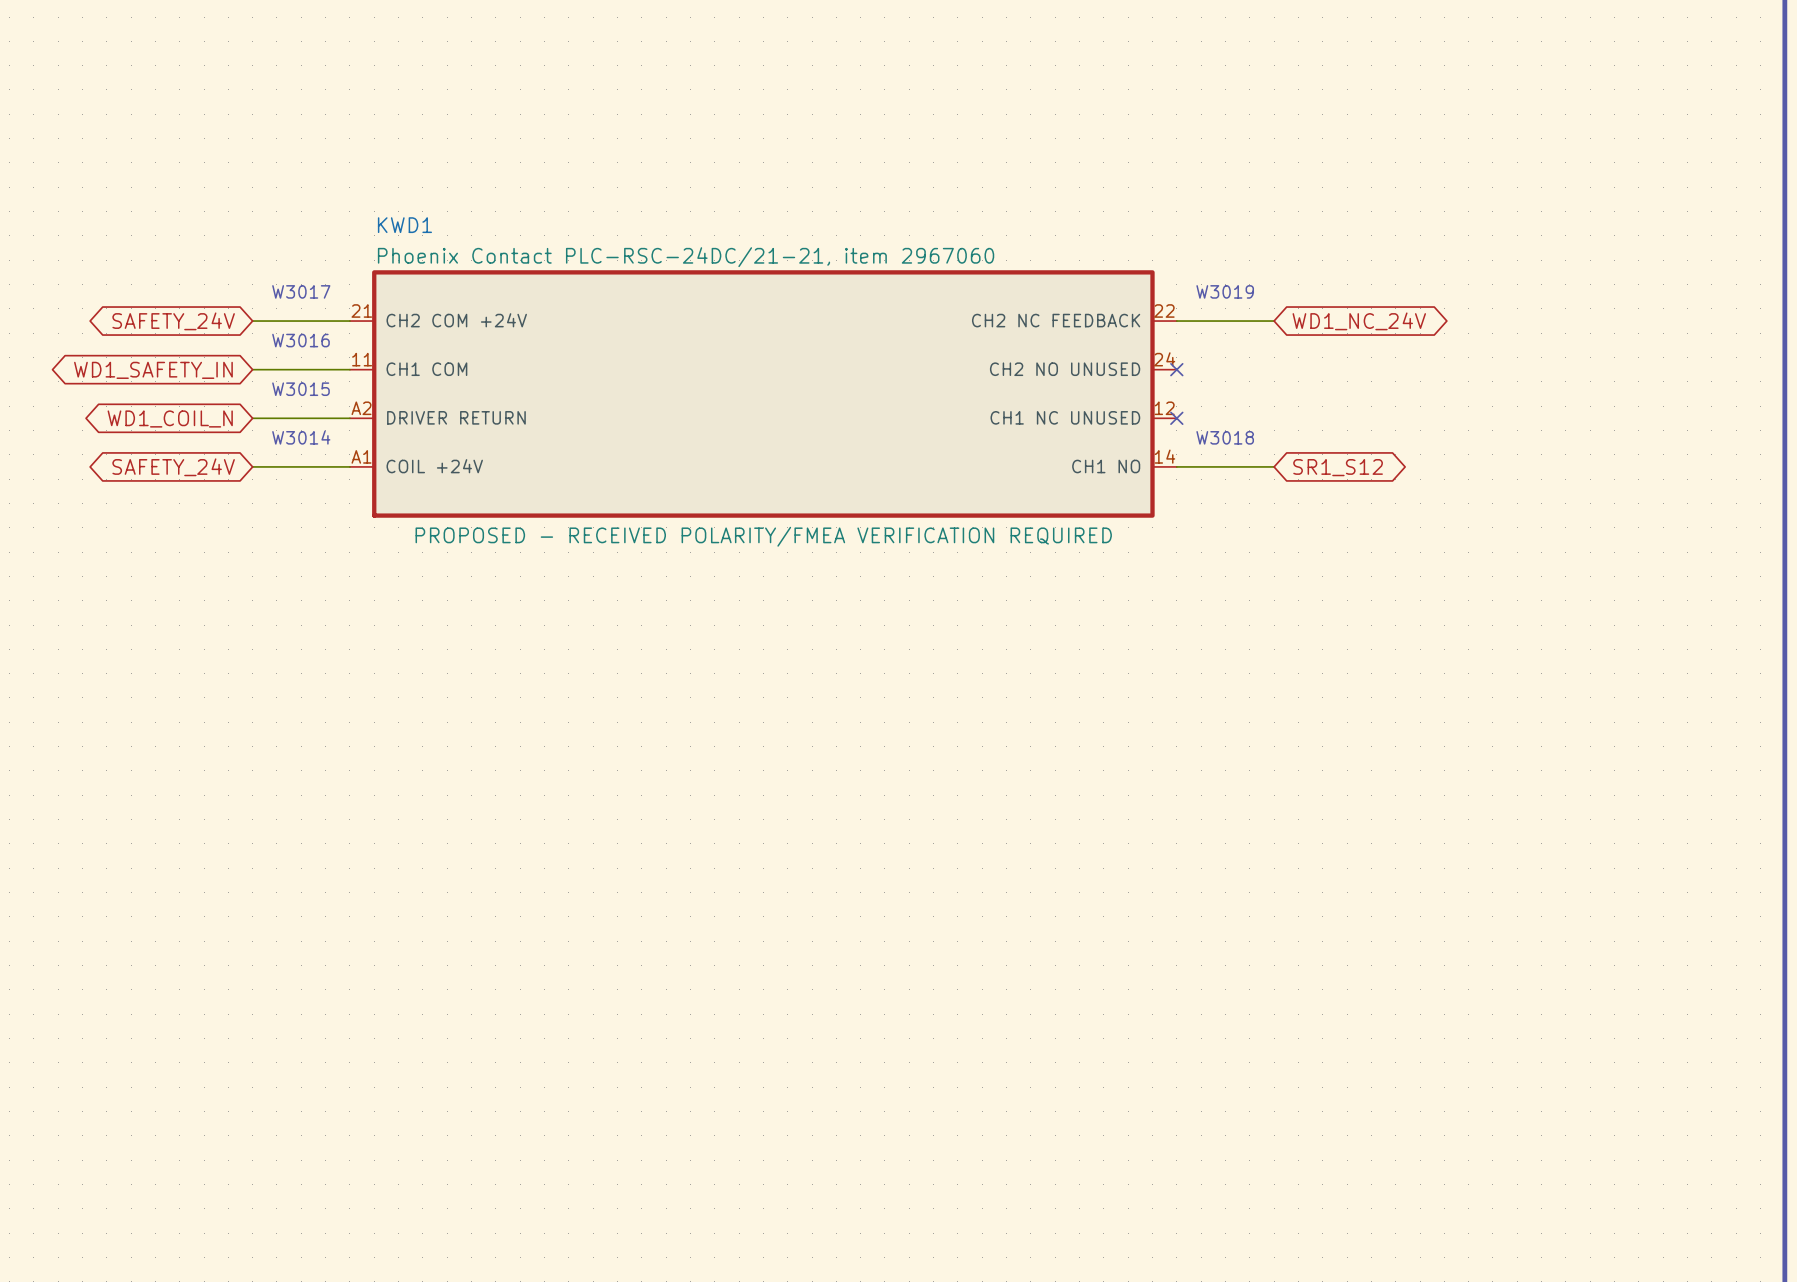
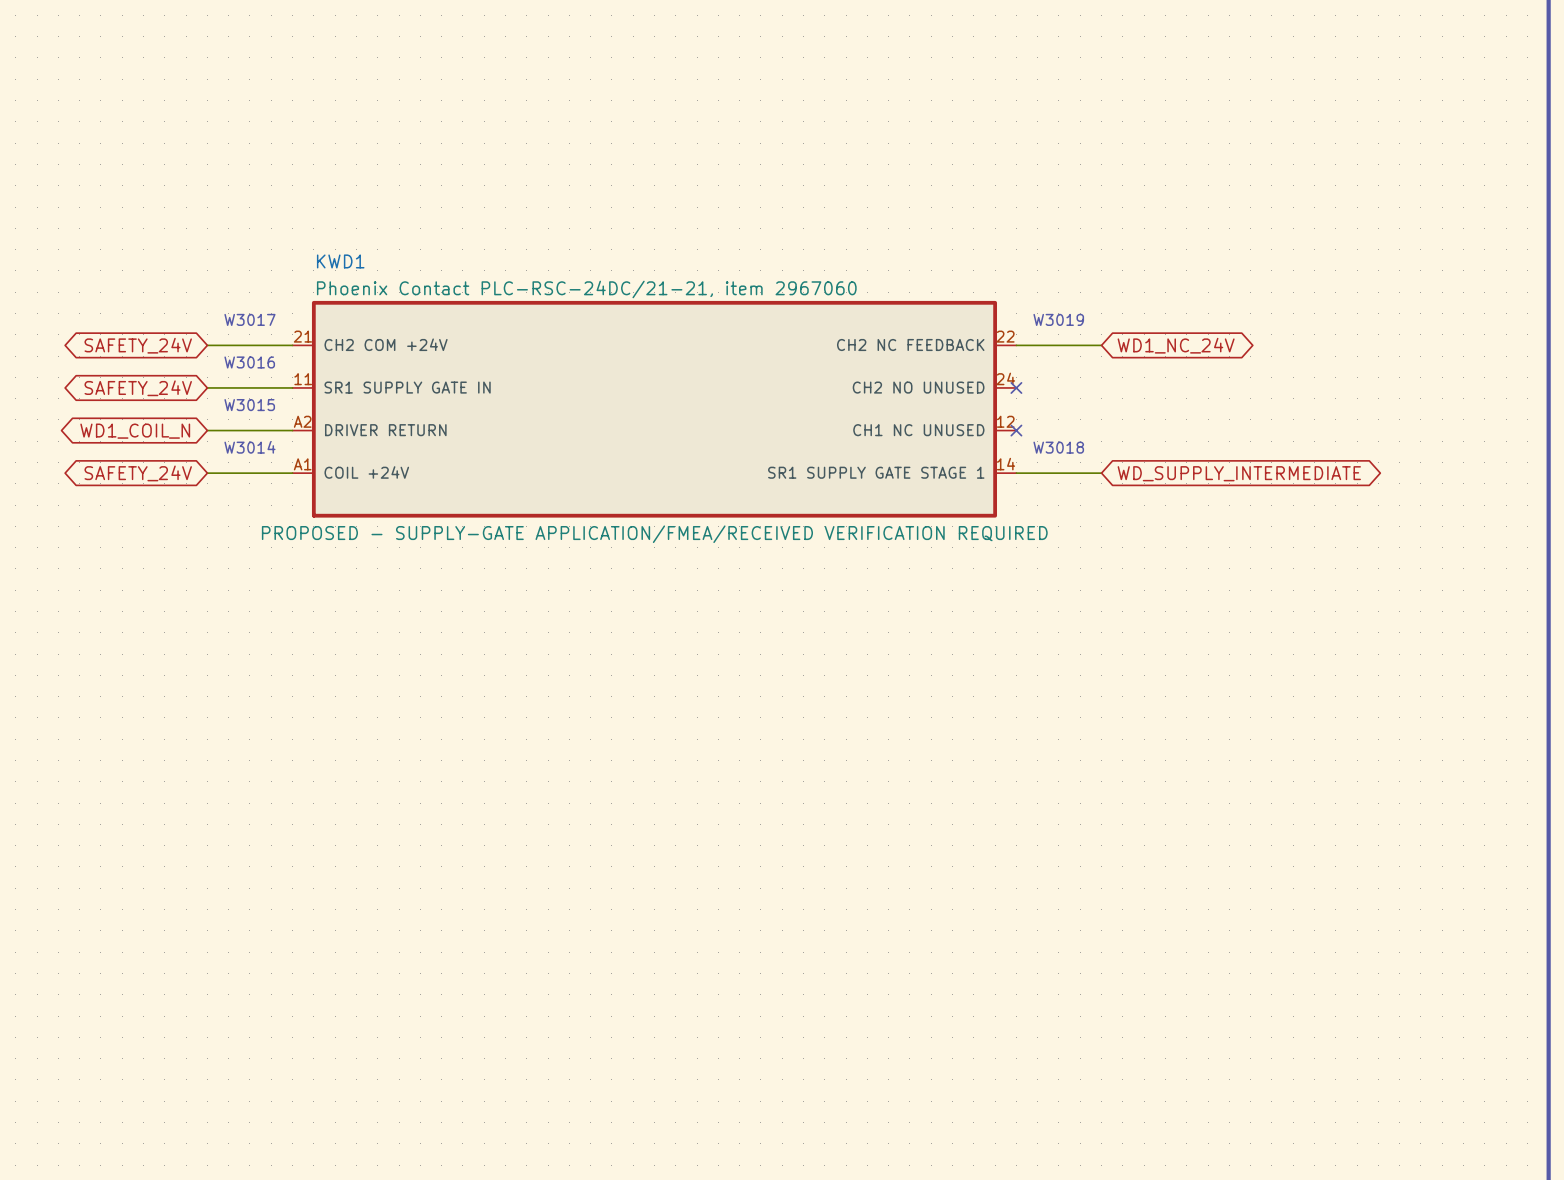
KWD1 pin name: CH1 COM (426, 369) -> SR1 SUPPLY GATE IN (407, 387)
global label: WD1_SAFETY_IN (153, 370) -> SAFETY_24V (138, 388)
KWD1 pin name: CH1 NO (1106, 466) -> SR1 SUPPLY GATE STAGE 1 (876, 472)
global label: SR1_S12 (1338, 467) -> WD_SUPPLY_INTERMEDIATE (1239, 473)
KWD1 text: PROPOSED - RECEIVED POLARITY/FMEA VERIFICATION REQUIRED (763, 536) -> PROPOSED - SUPPLY-GATE APPLICATION/FMEA/RECEIVED VERIFICATION REQUIRED (654, 534)

